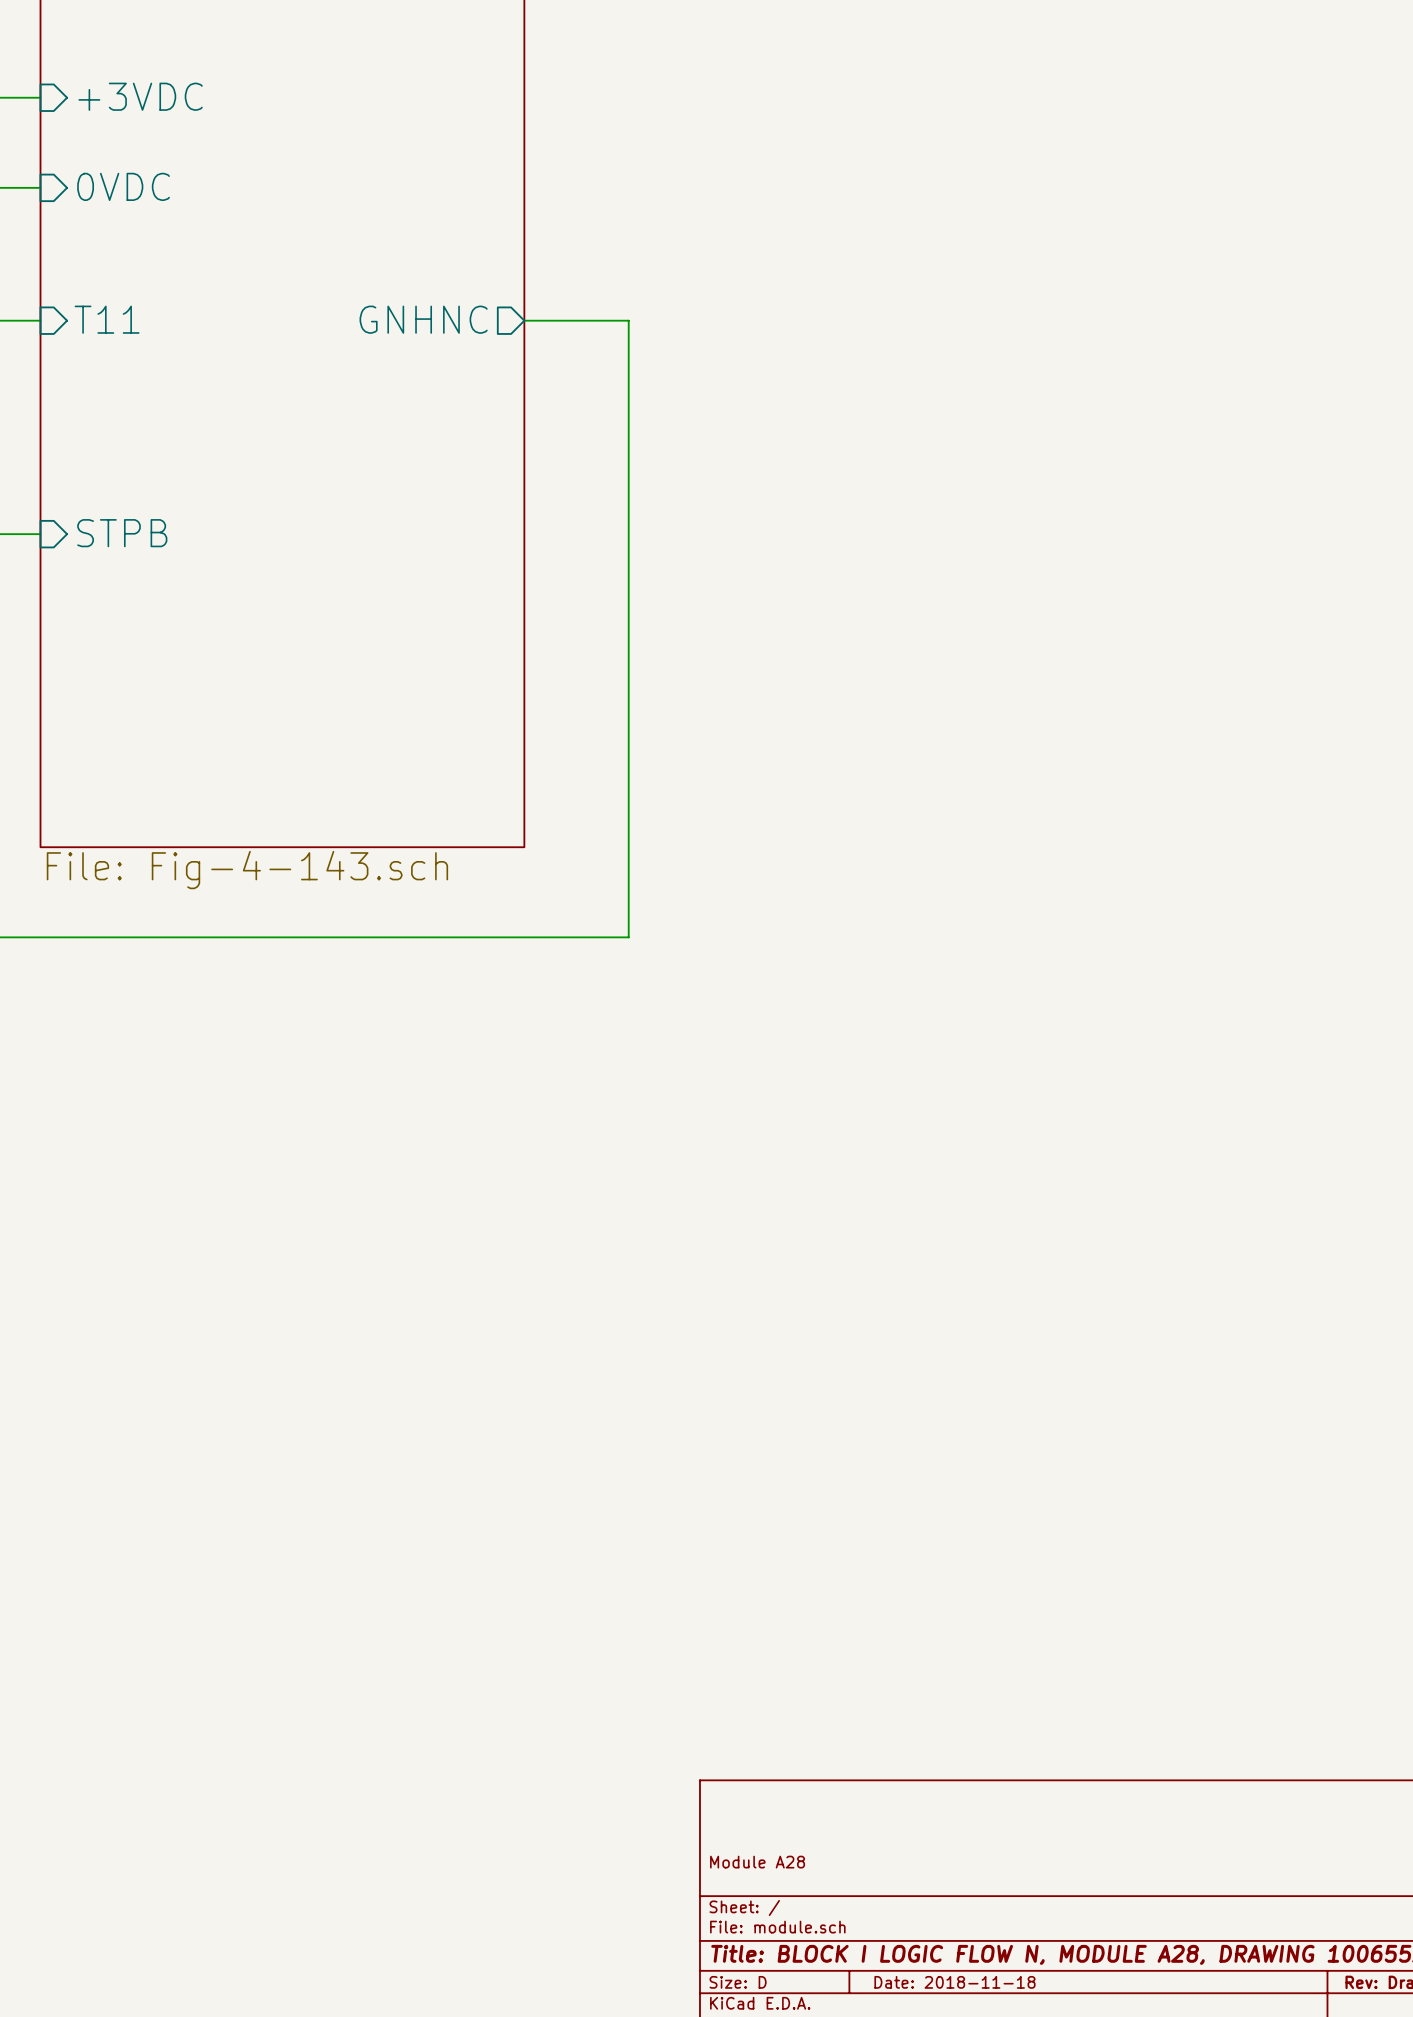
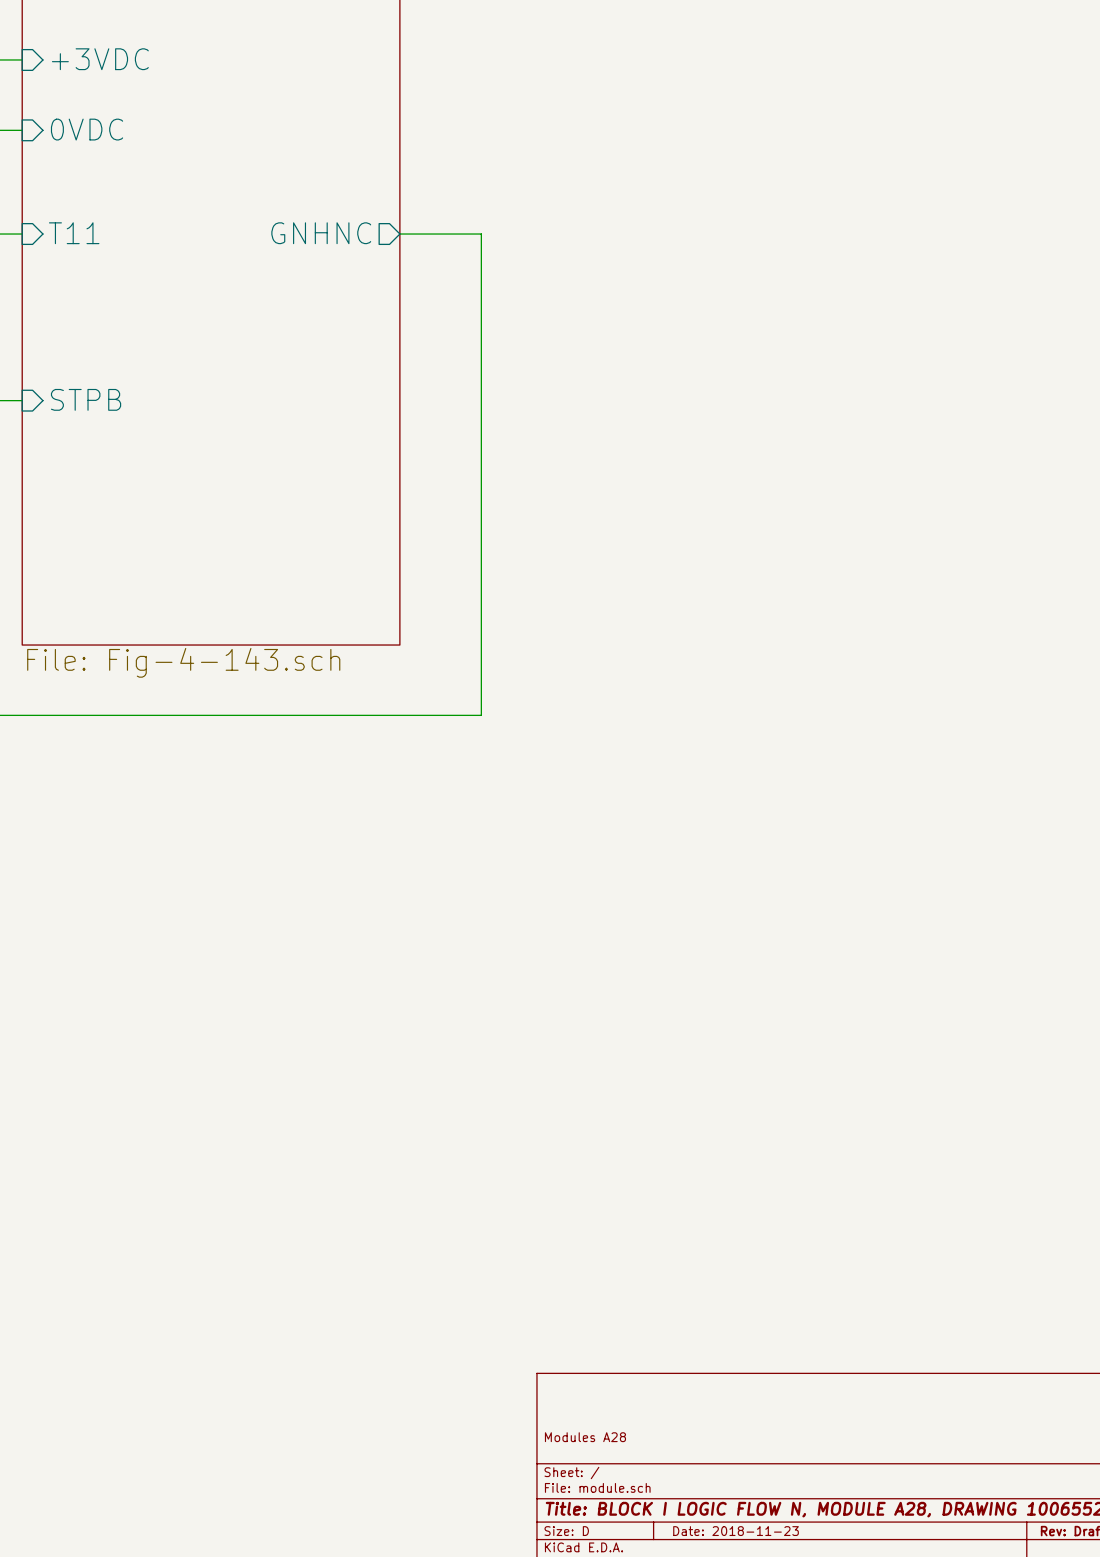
title block: Module A28 (757, 1862) -> Modules A28 (585, 1437)
title block: Date: 2018-11-18 (954, 1982) -> Date: 2018-11-23 (736, 1531)

